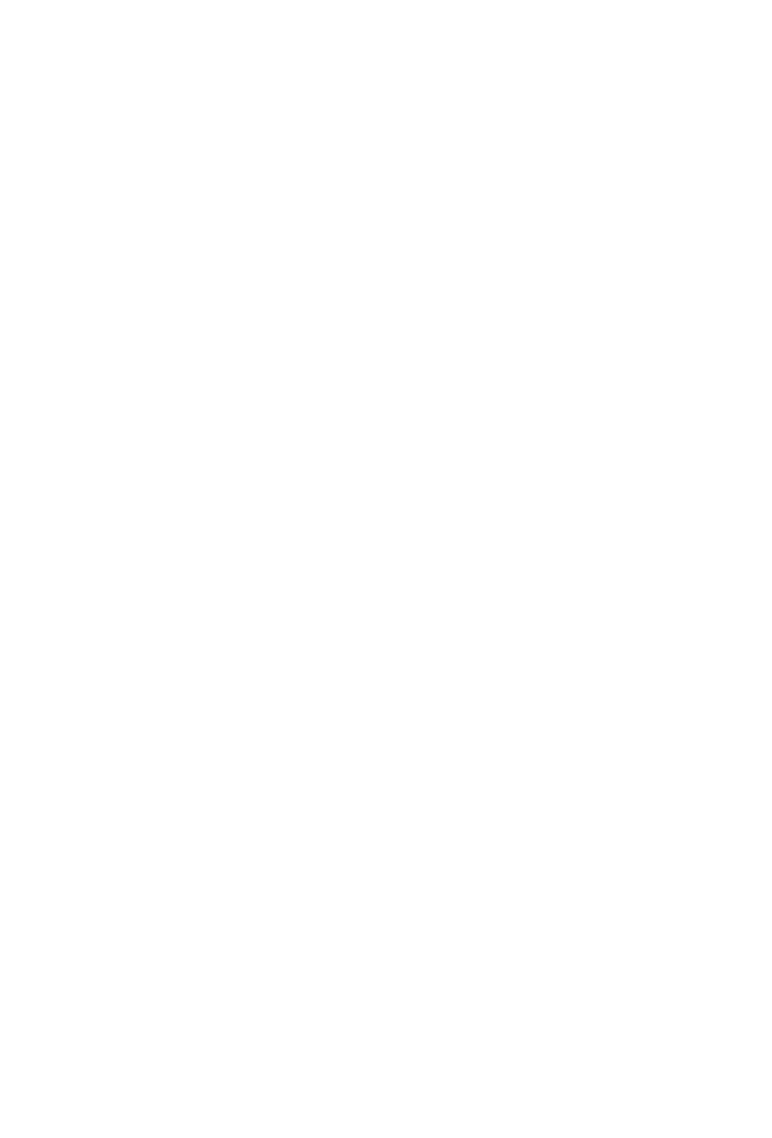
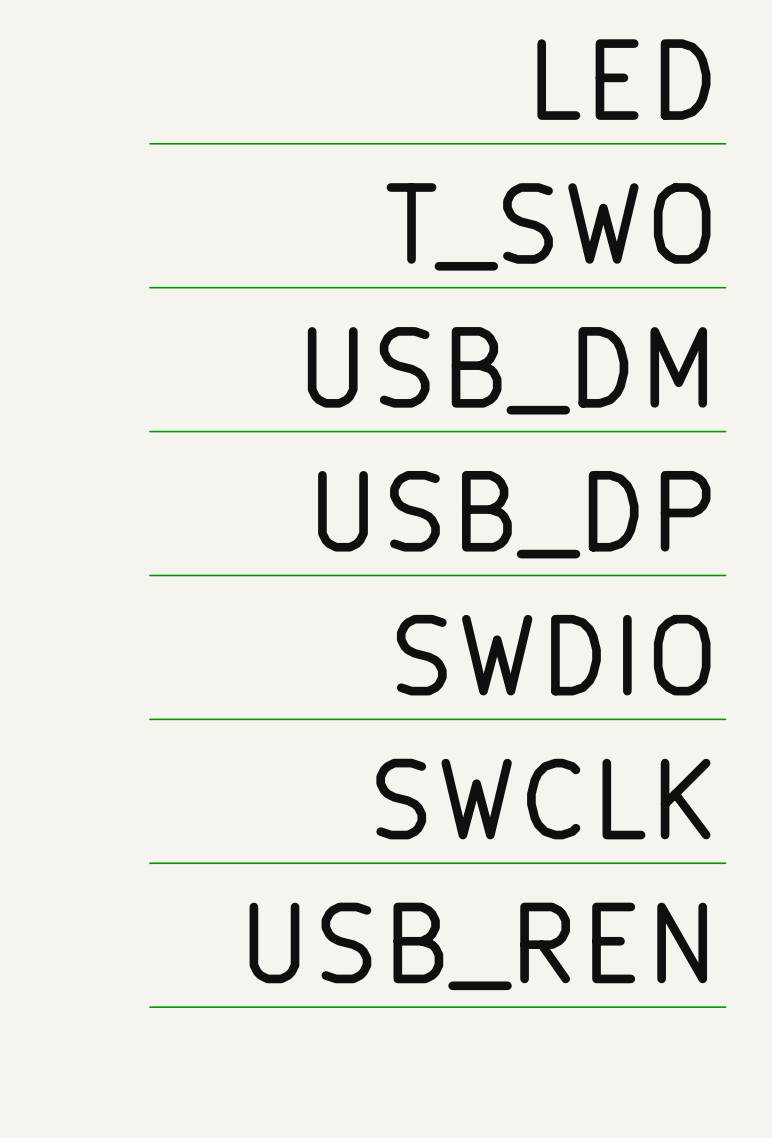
label: none -> LED (623, 79)
wire: none -> (149, 143) (725, 143)
label: none -> T_SWO (548, 226)
wire: none -> (149, 287) (725, 287)
label: none -> USB_DM (507, 370)
wire: none -> (149, 431) (725, 431)
label: none -> USB_DP (514, 514)
wire: none -> (149, 575) (725, 575)
label: none -> SWDIO (553, 655)
wire: none -> (149, 719) (725, 719)
label: none -> SWCLK (543, 799)
wire: none -> (149, 863) (725, 863)
label: none -> USB_REN (478, 946)
wire: none -> (149, 1007) (725, 1007)

